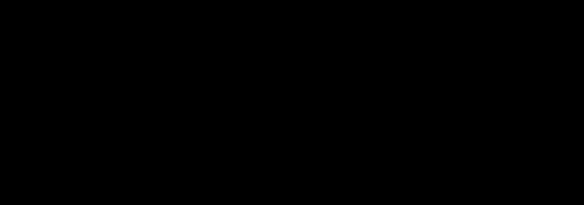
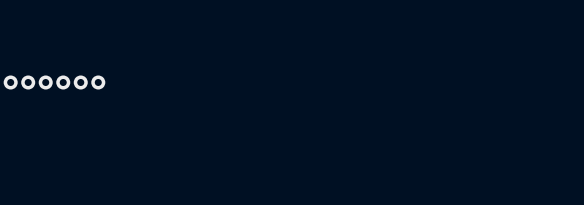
via: none -> (10, 82)
via: none -> (28, 82)
via: none -> (45, 82)
via: none -> (63, 82)
via: none -> (80, 82)
via: none -> (98, 82)

